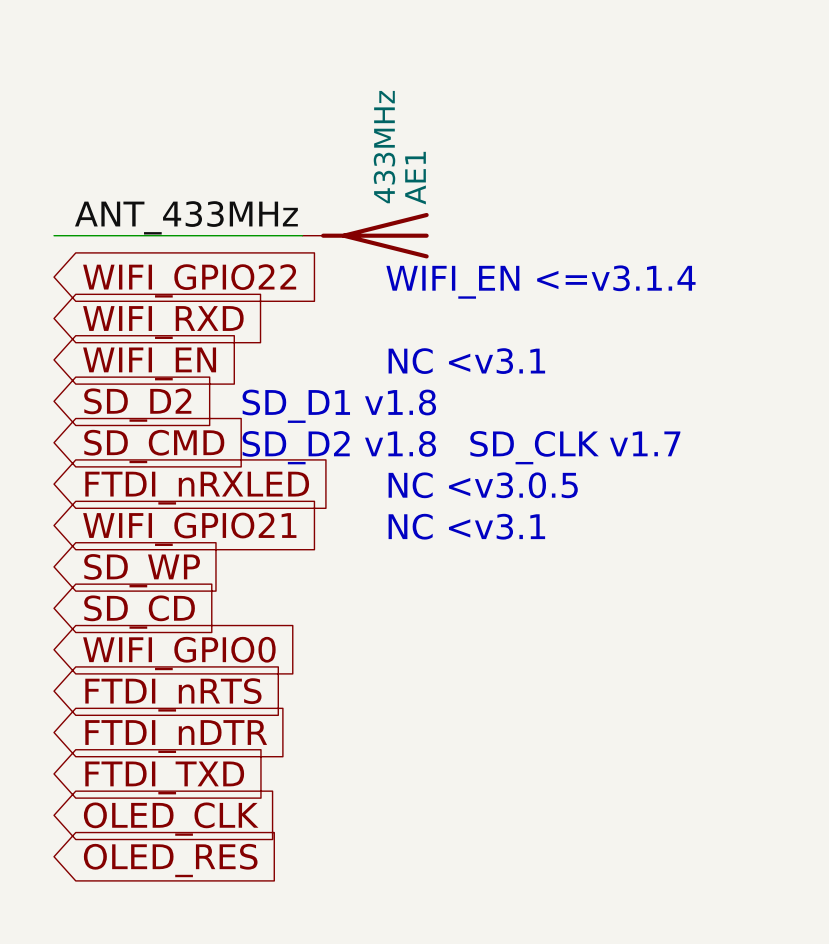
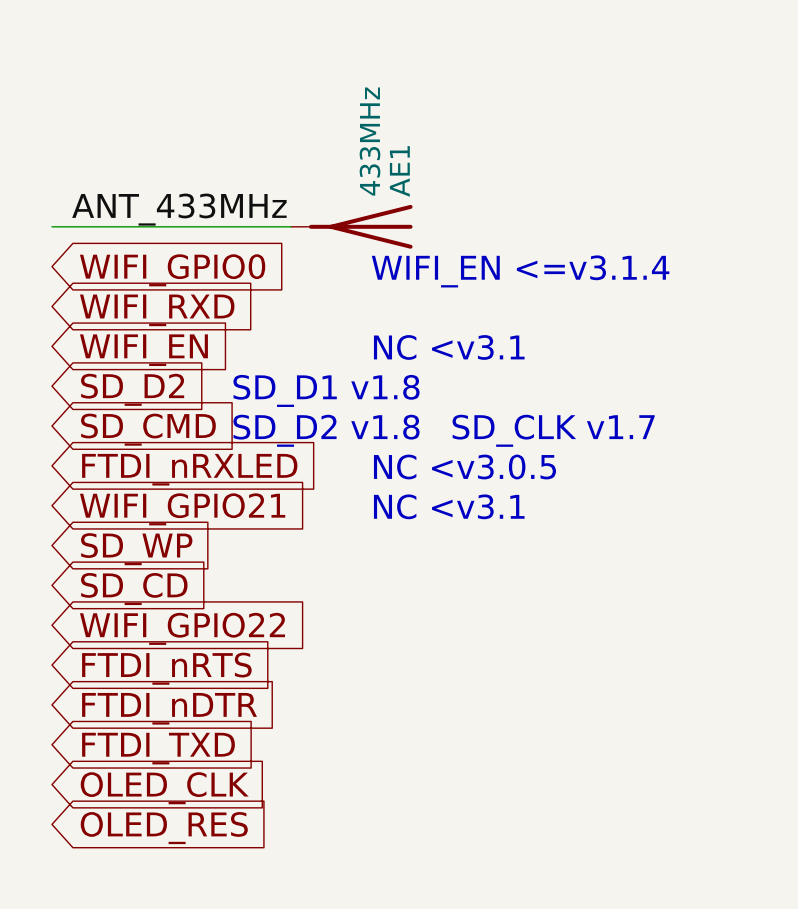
global label: WIFI_GPIO22 (189, 280) -> WIFI_GPIO0 (172, 270)
global label: WIFI_GPIO0 (179, 653) -> WIFI_GPIO22 (182, 628)

